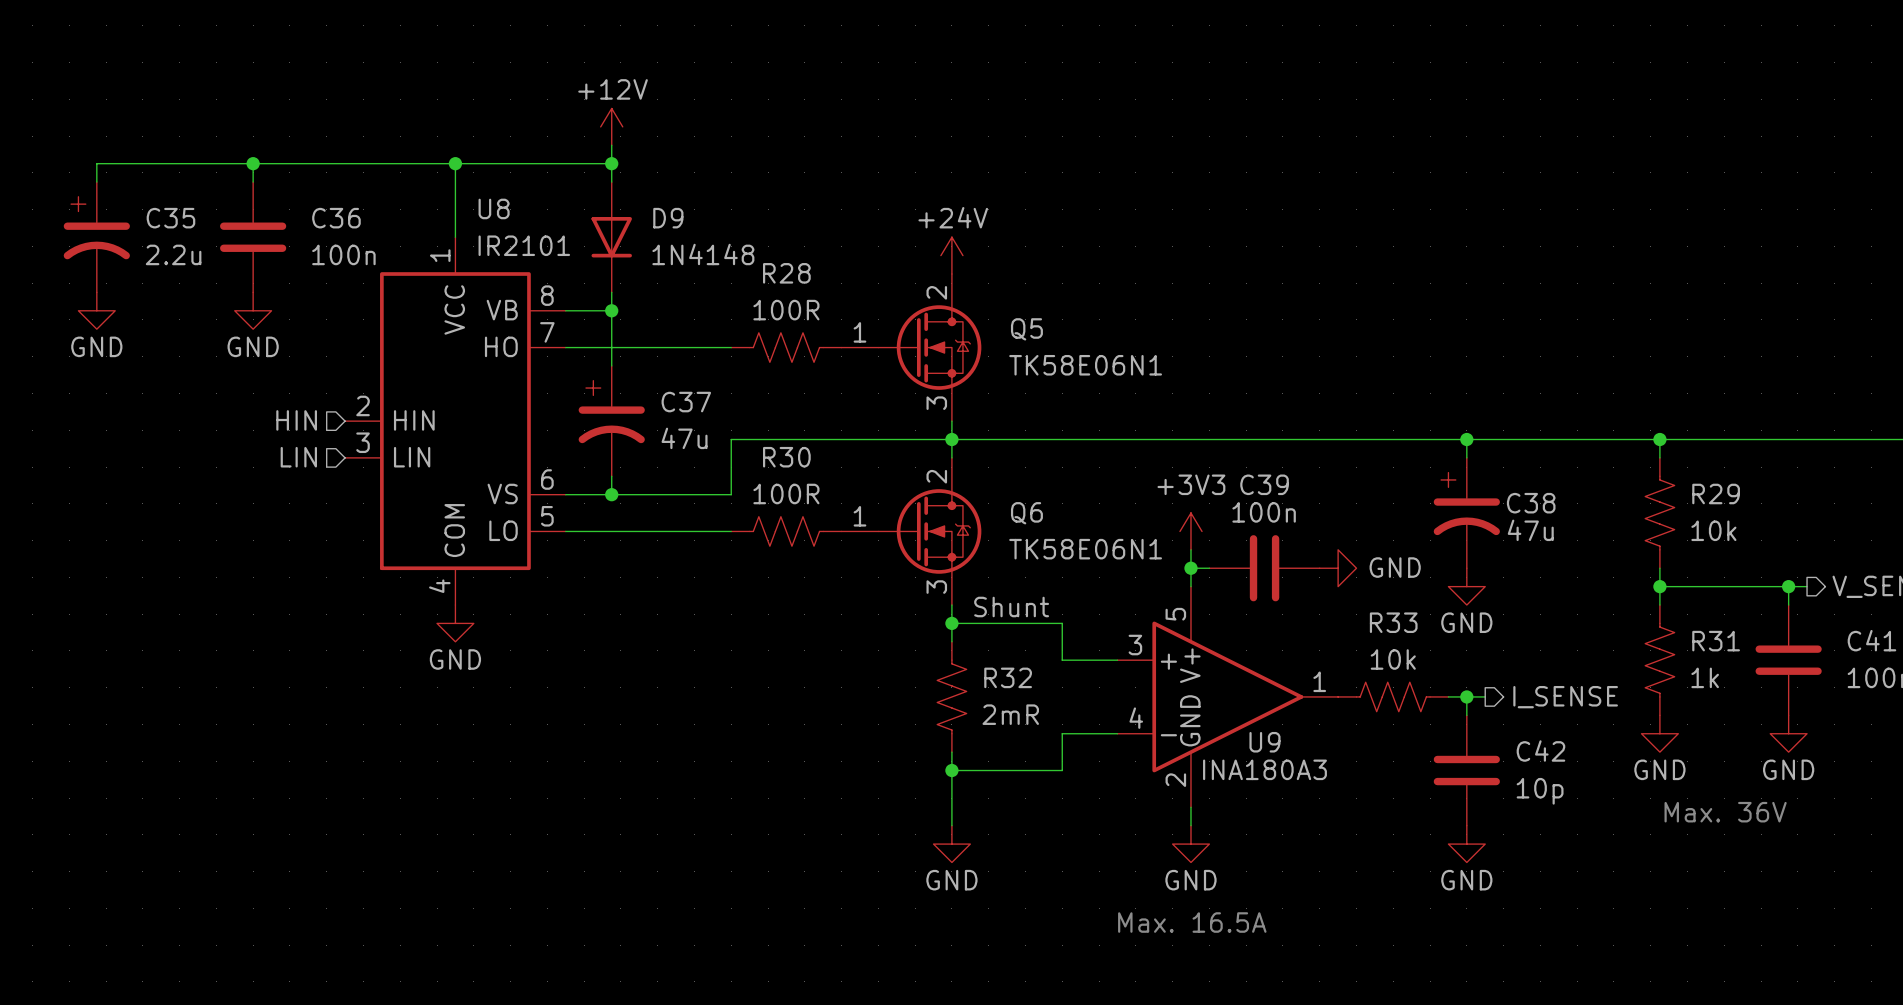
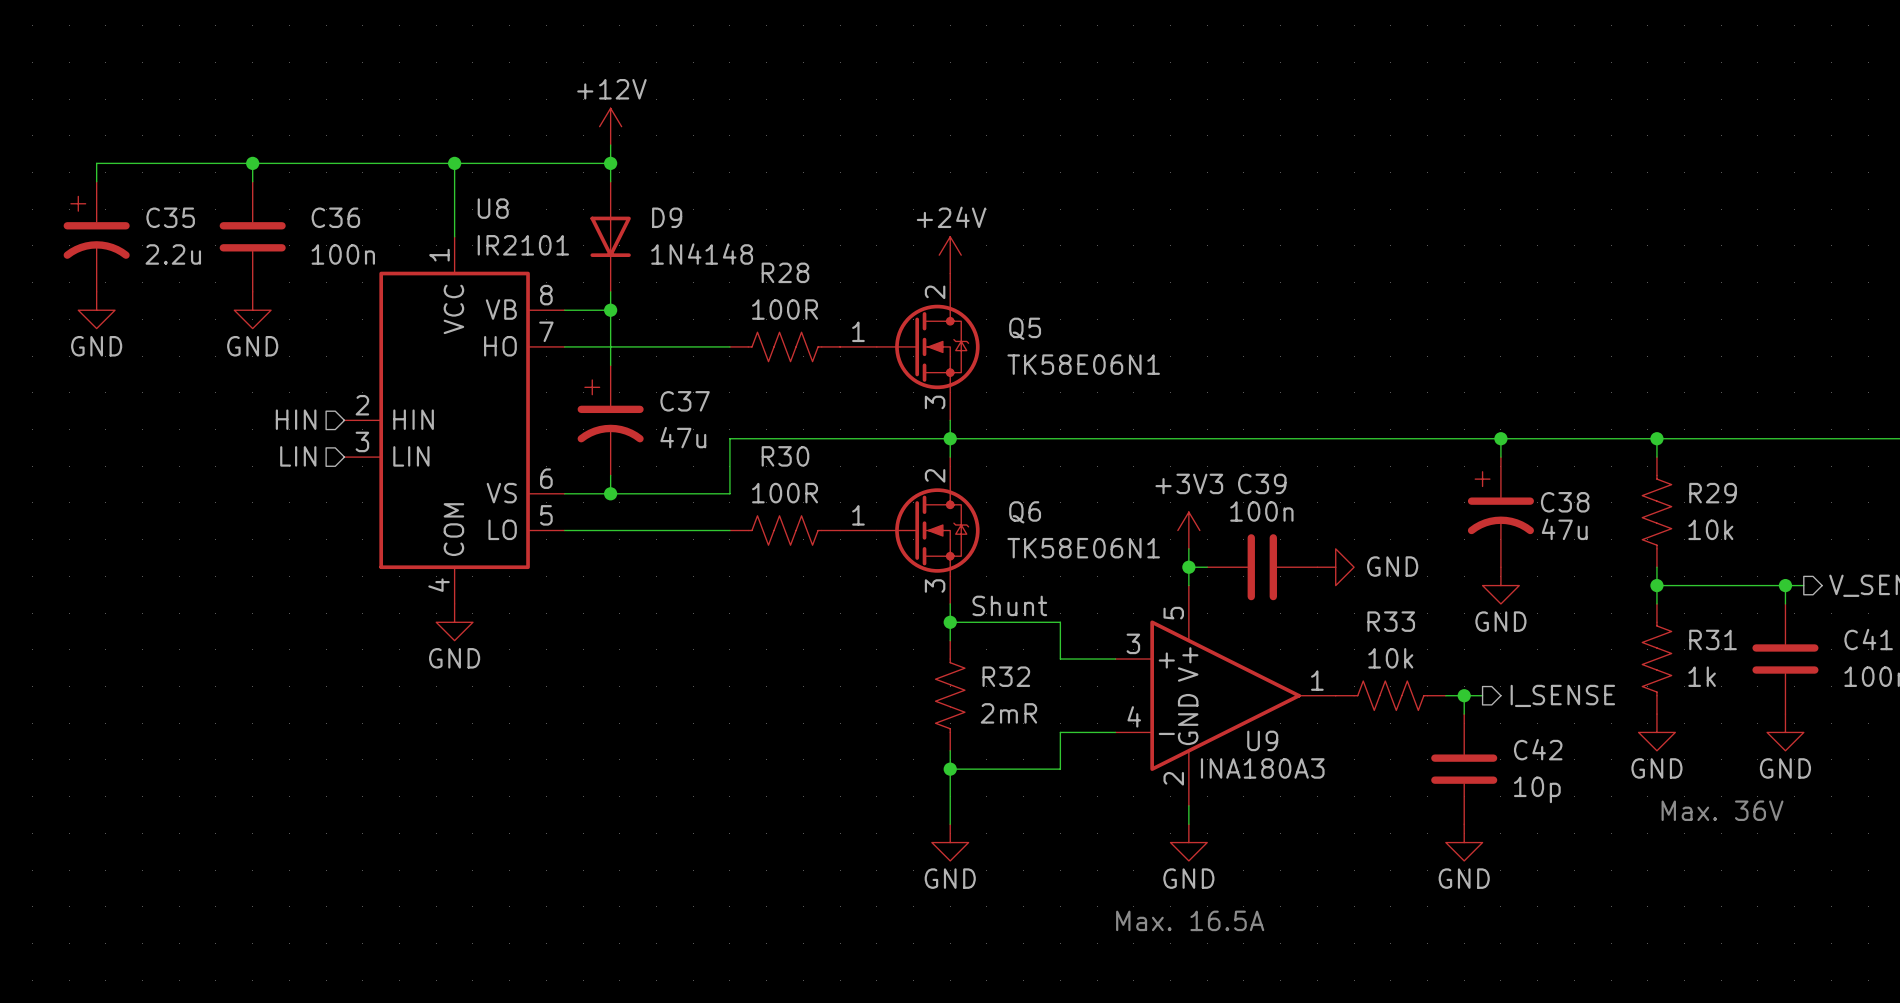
wire: (1466, 439) (1466, 457) -> (1500, 438) (1500, 457)
junction position: (1466, 439) -> (1500, 438)
C38 position: (1466, 513) -> (1500, 512)
power symbol position: GND (1466, 586) -> GND (1500, 585)

